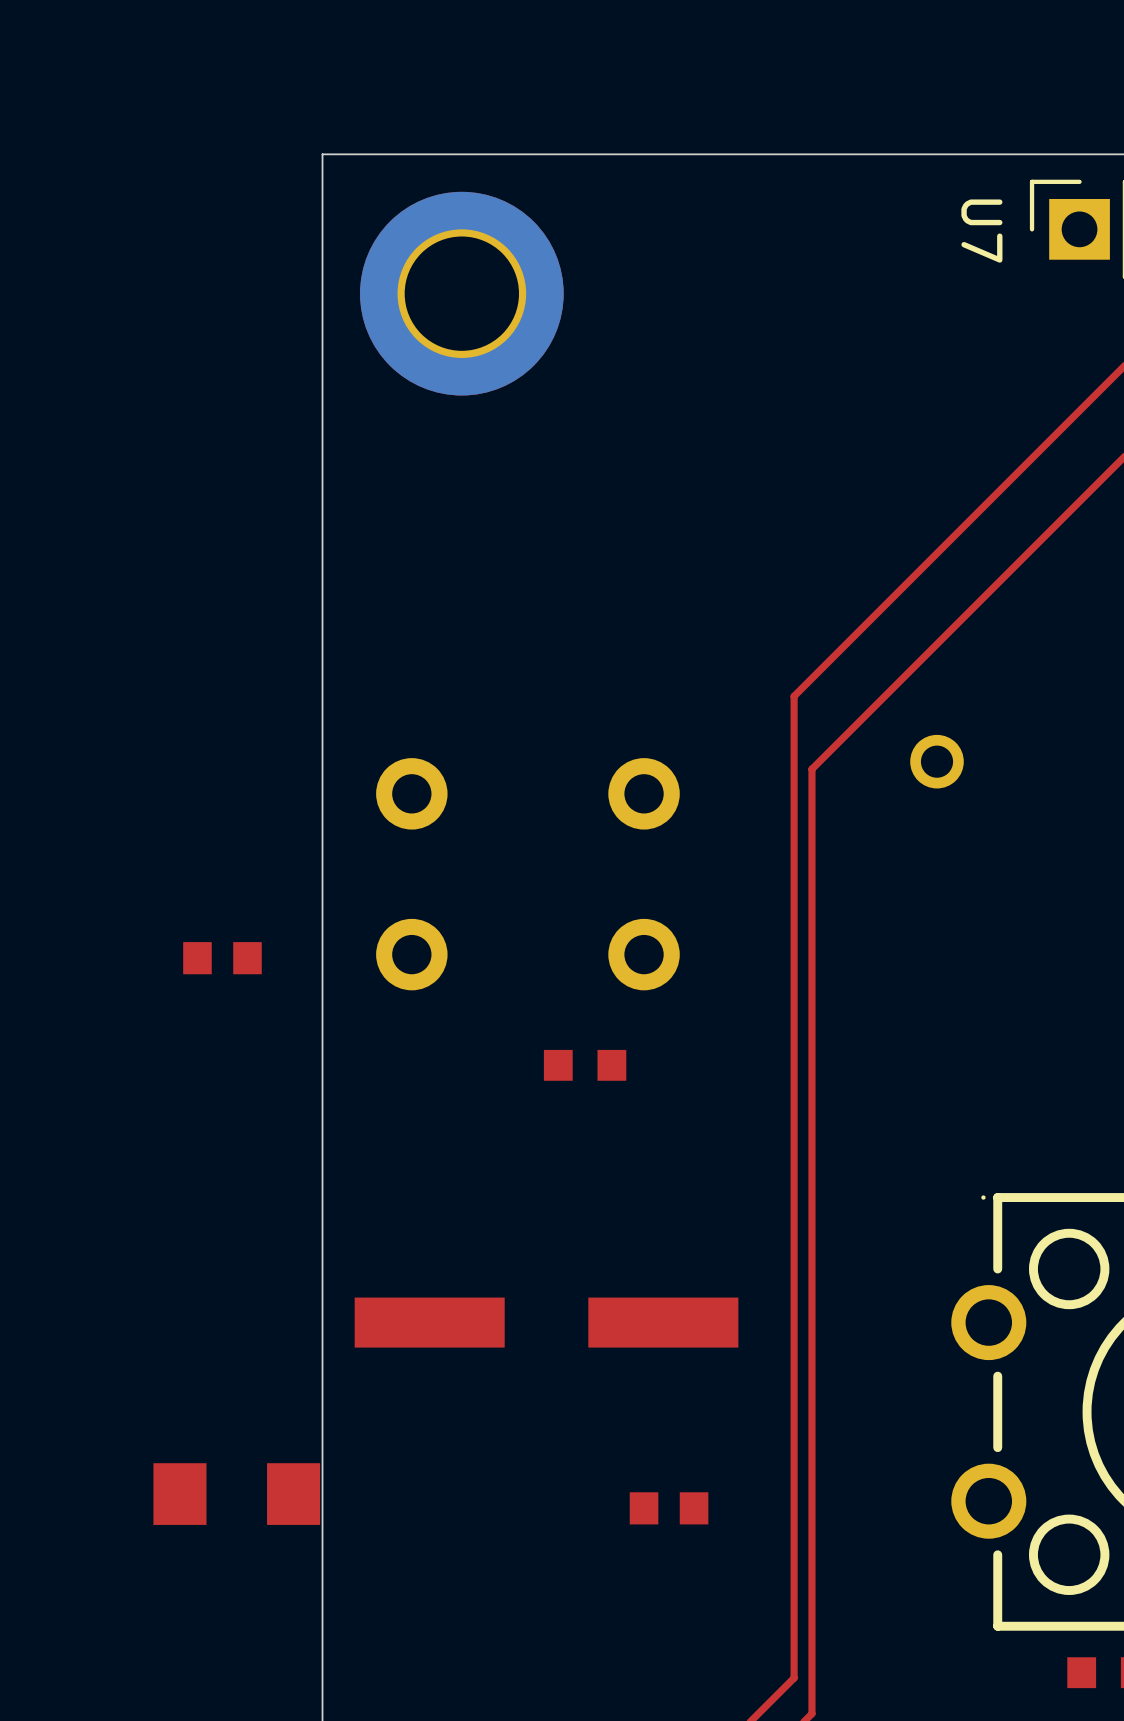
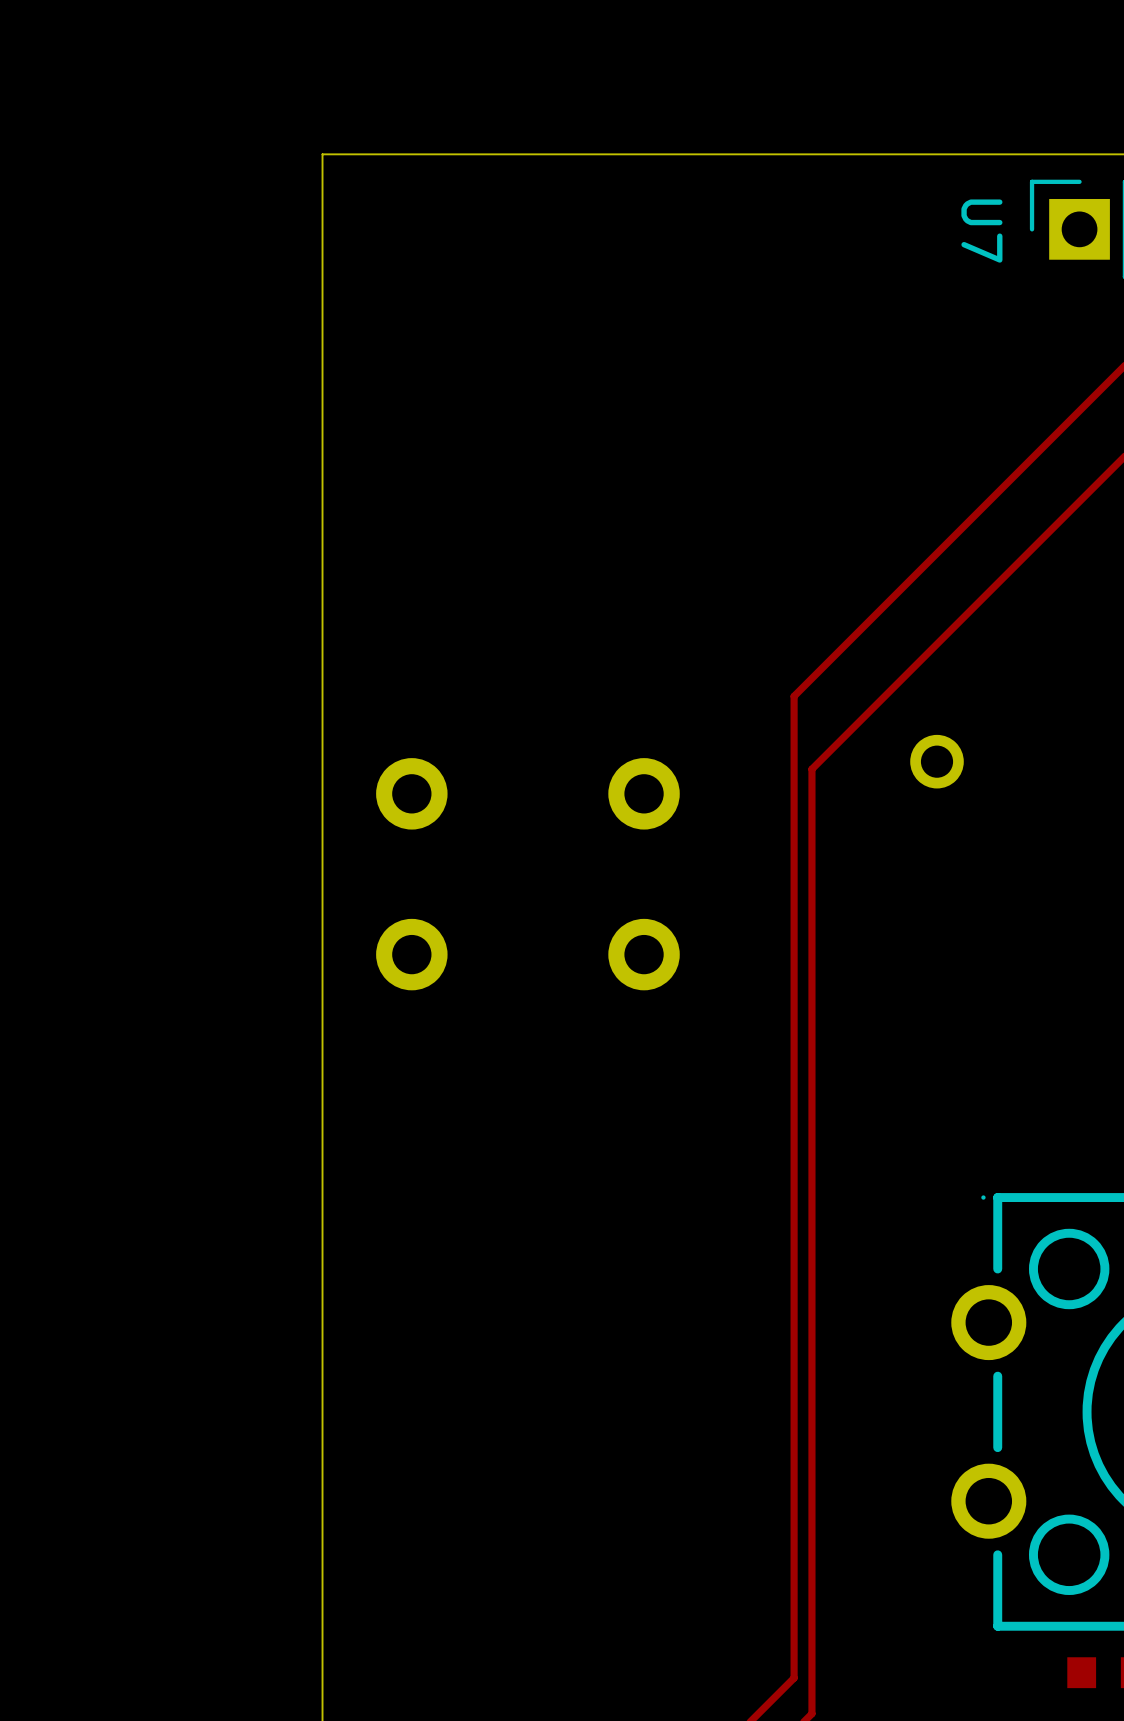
part: (461, 293) -> none
part: (222, 958) -> none
part: (585, 1065) -> none
part: (546, 1322) -> none
part: (236, 1494) -> none
part: (669, 1508) -> none

